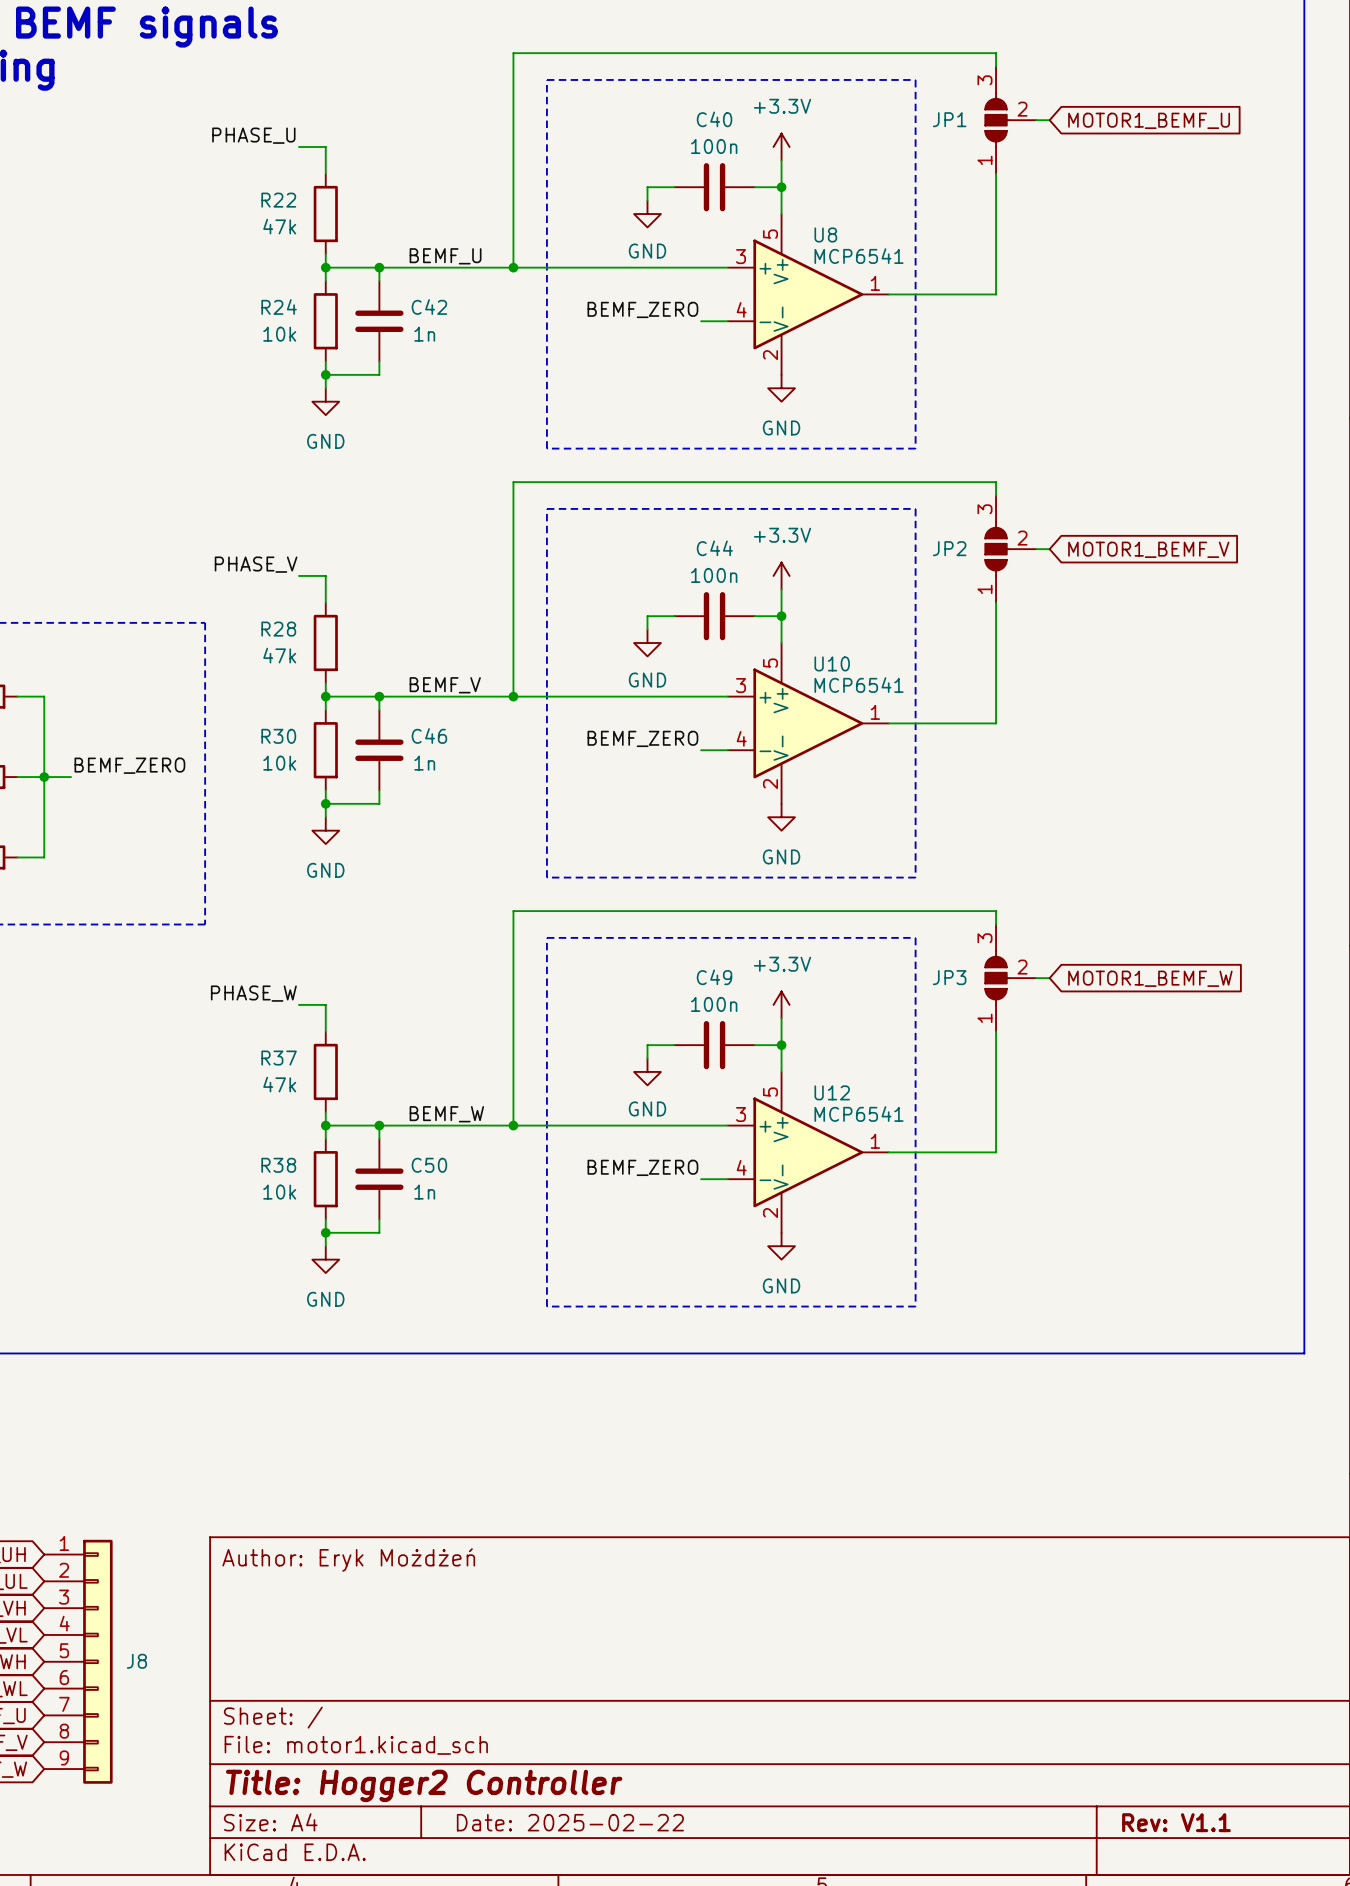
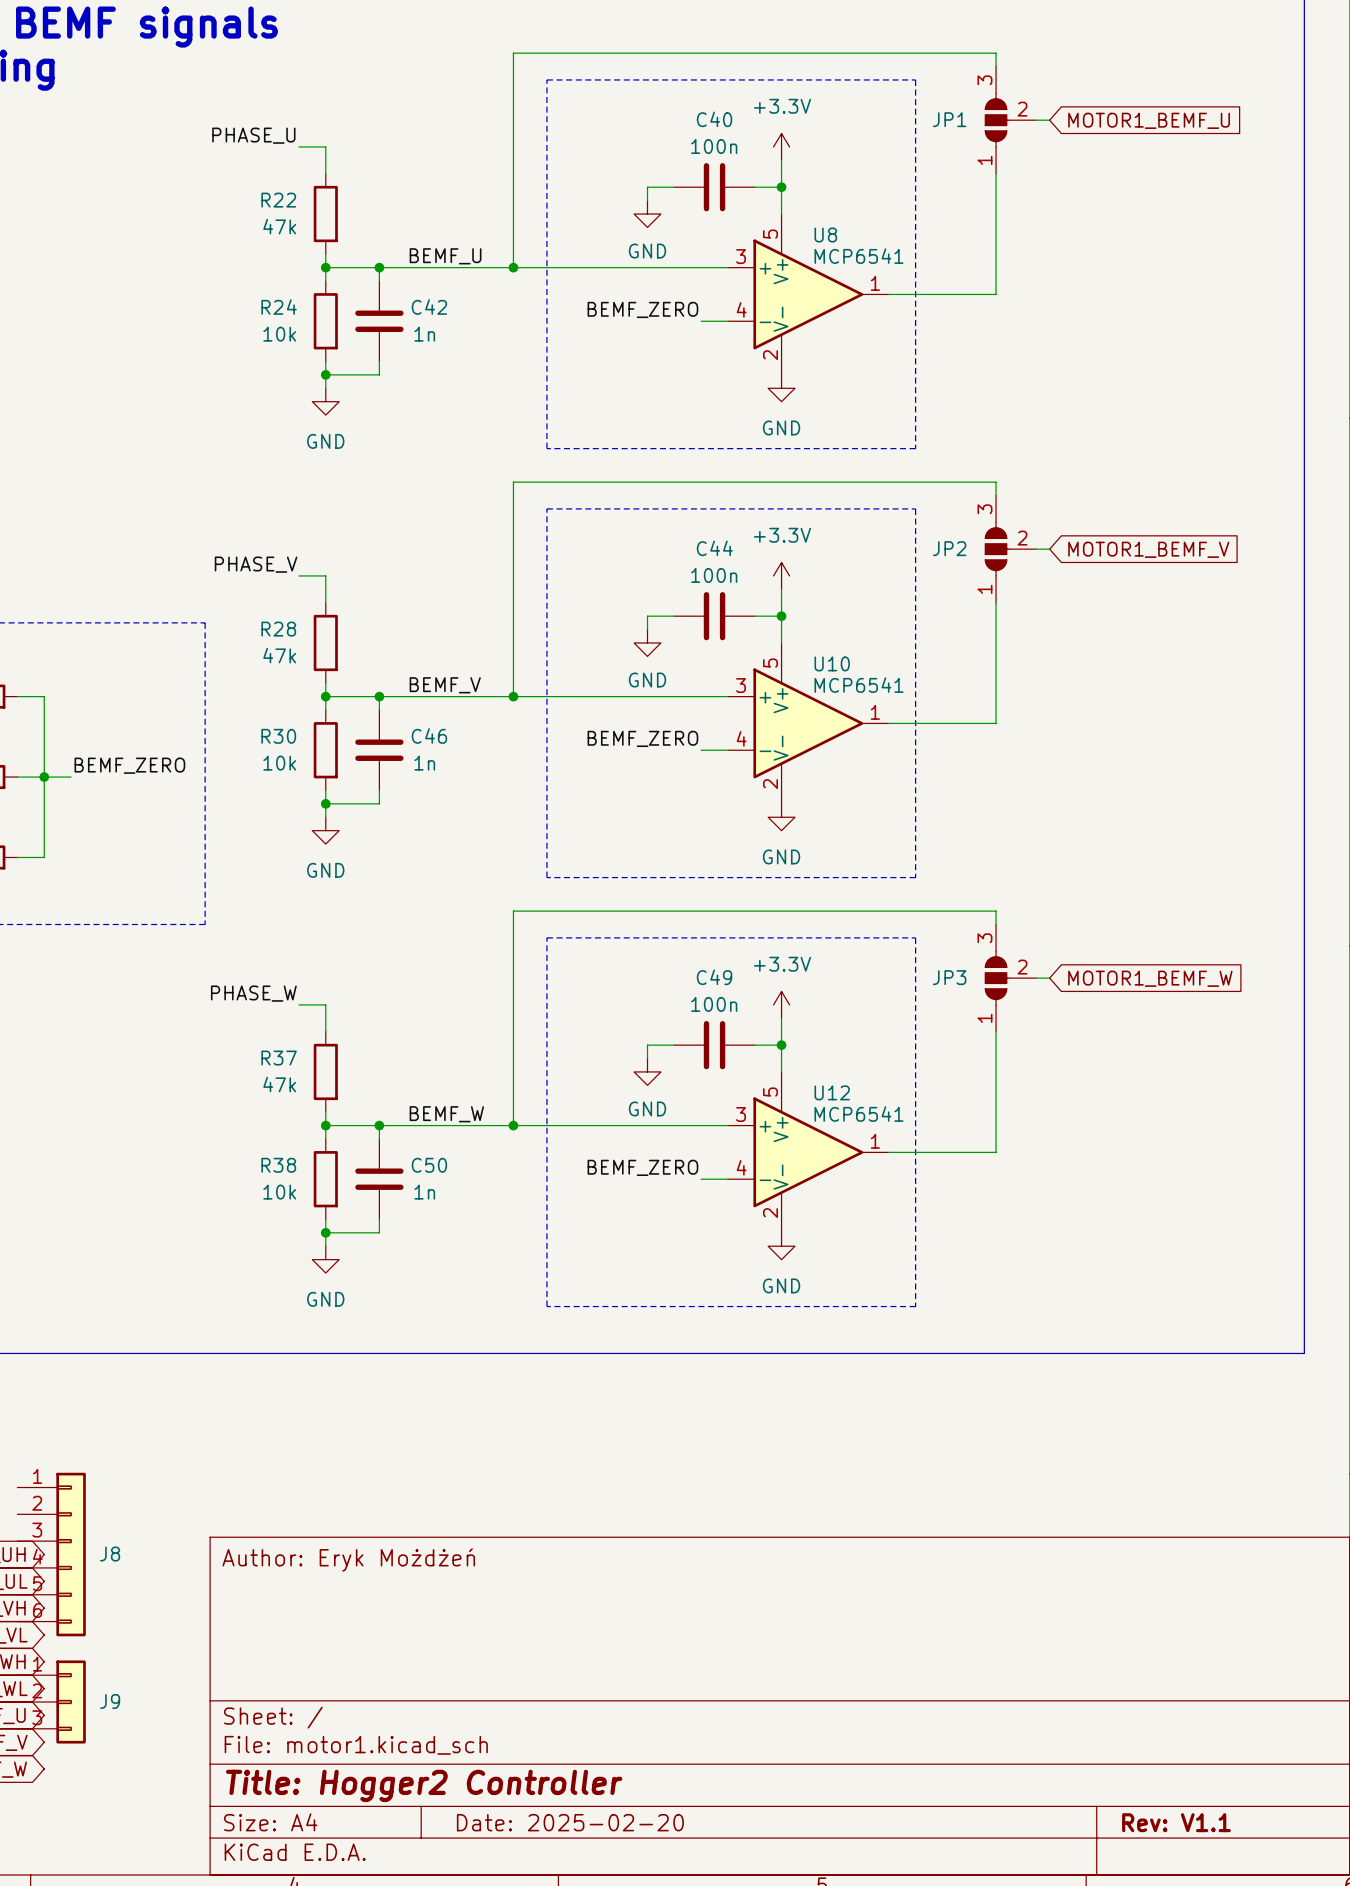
J8 symbol: [44, 1539, 113, 1784] -> [17, 1472, 86, 1637]
J9: none -> (51, 1701)
title block: Date: 2025-02-22 (570, 1822) -> Date: 2025-02-20 (570, 1822)

